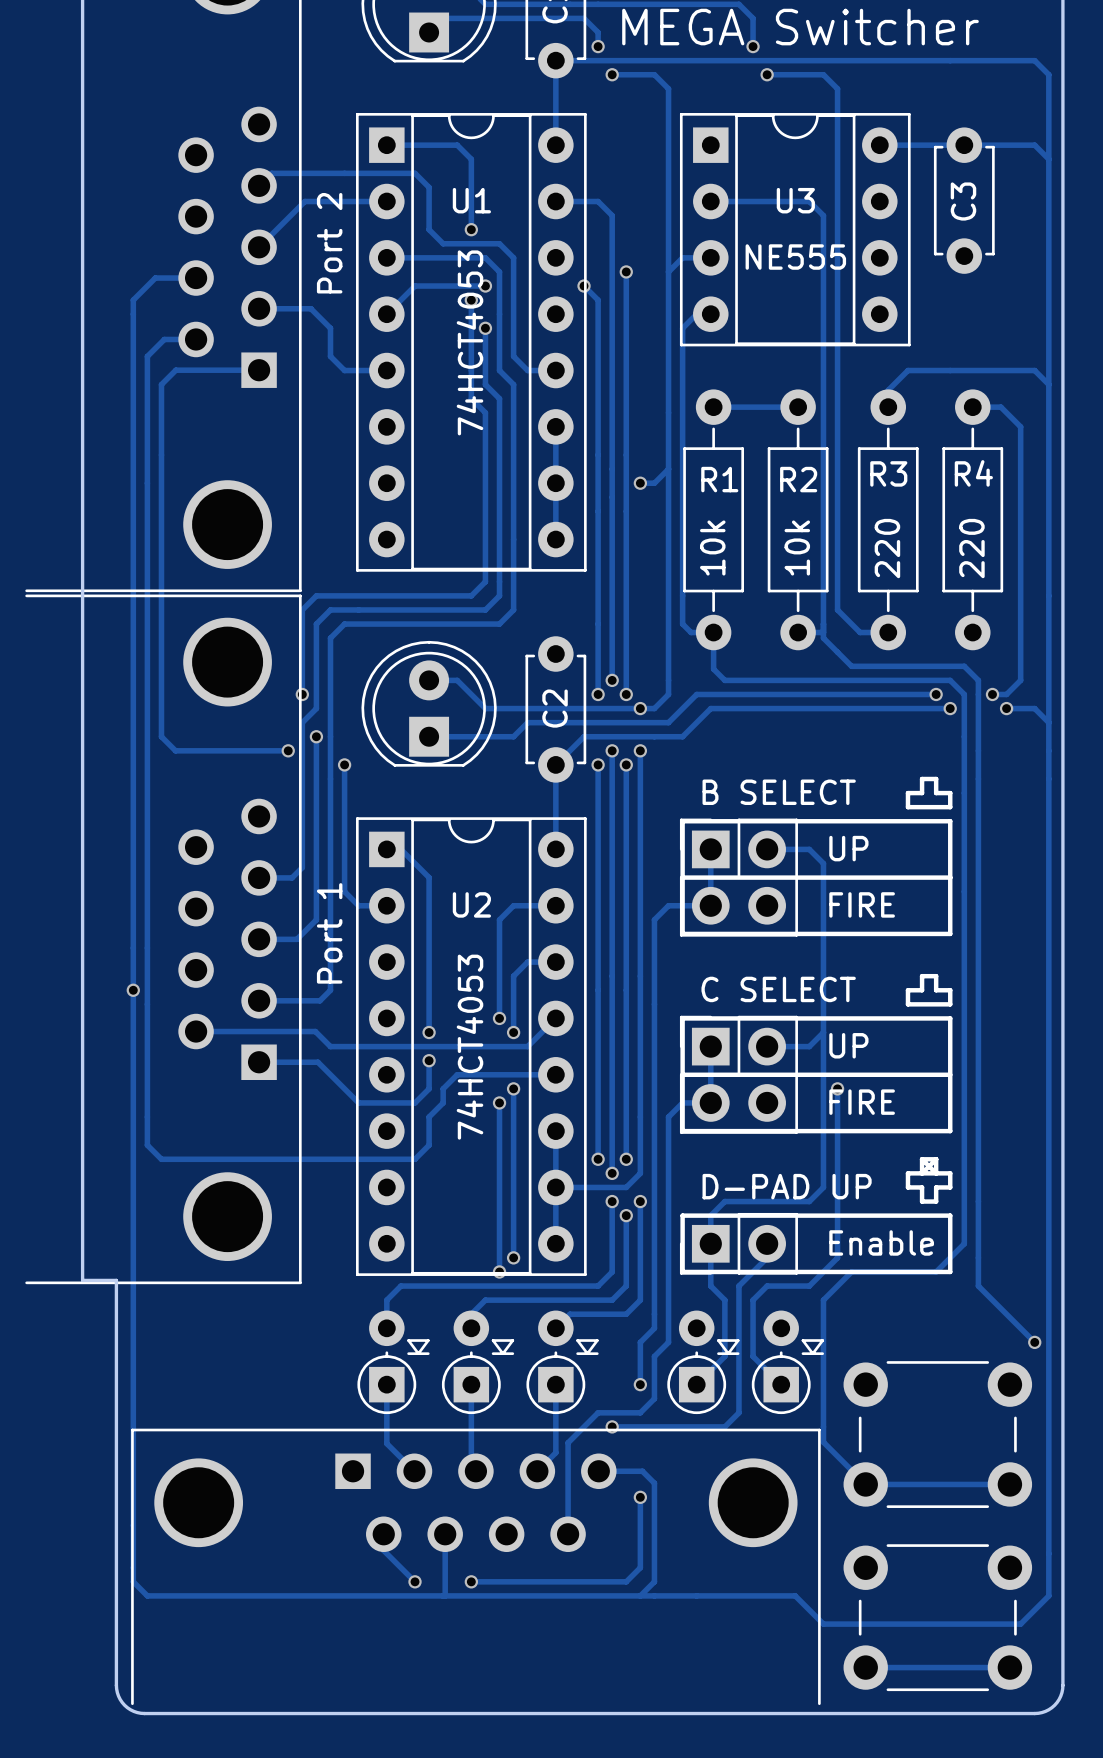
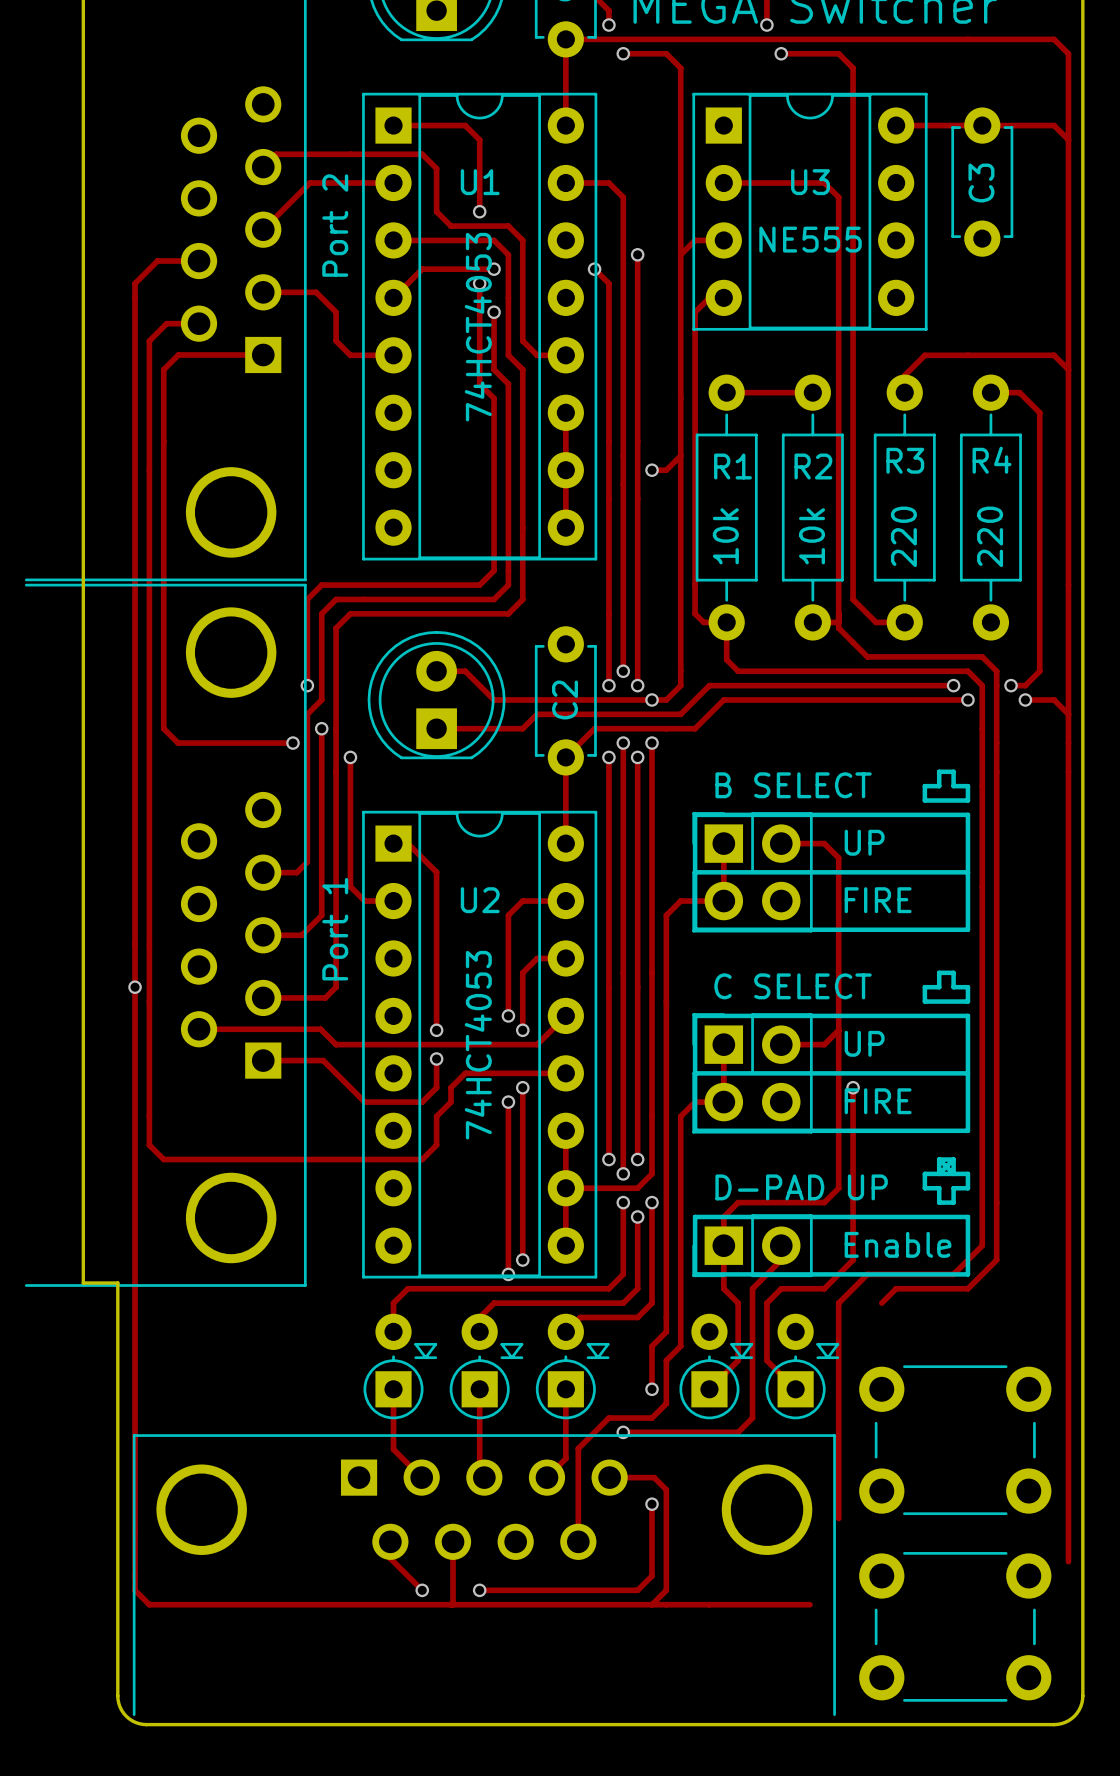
track: (978, 1257) (978, 1286) (1034, 1342) -> (996, 1260) (967, 1288) (896, 1288) (881, 1303)
via: (1034, 1342) -> none
track: (823, 1442) (865, 1484) (1009, 1484) -> (838, 1447) (838, 1518)
track: (1048, 1553) (1048, 1595) (1020, 1624) (823, 1624) (795, 1595) -> none
track: (865, 1667) (1009, 1667) -> none

